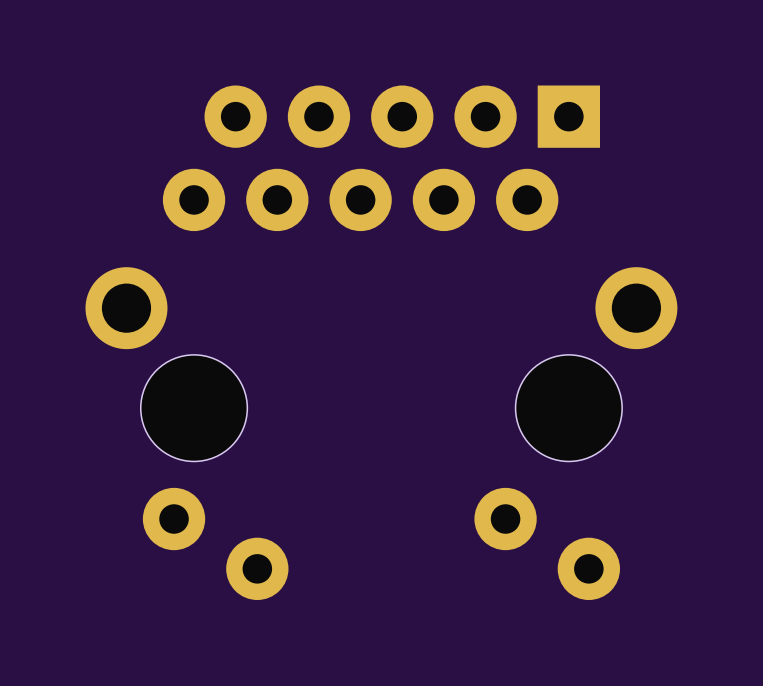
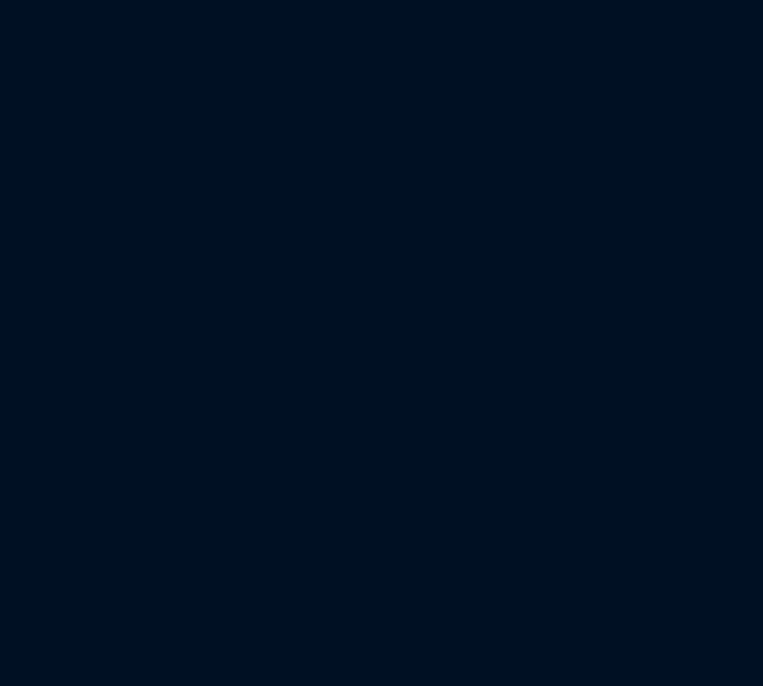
part: (381, 342) -> none

